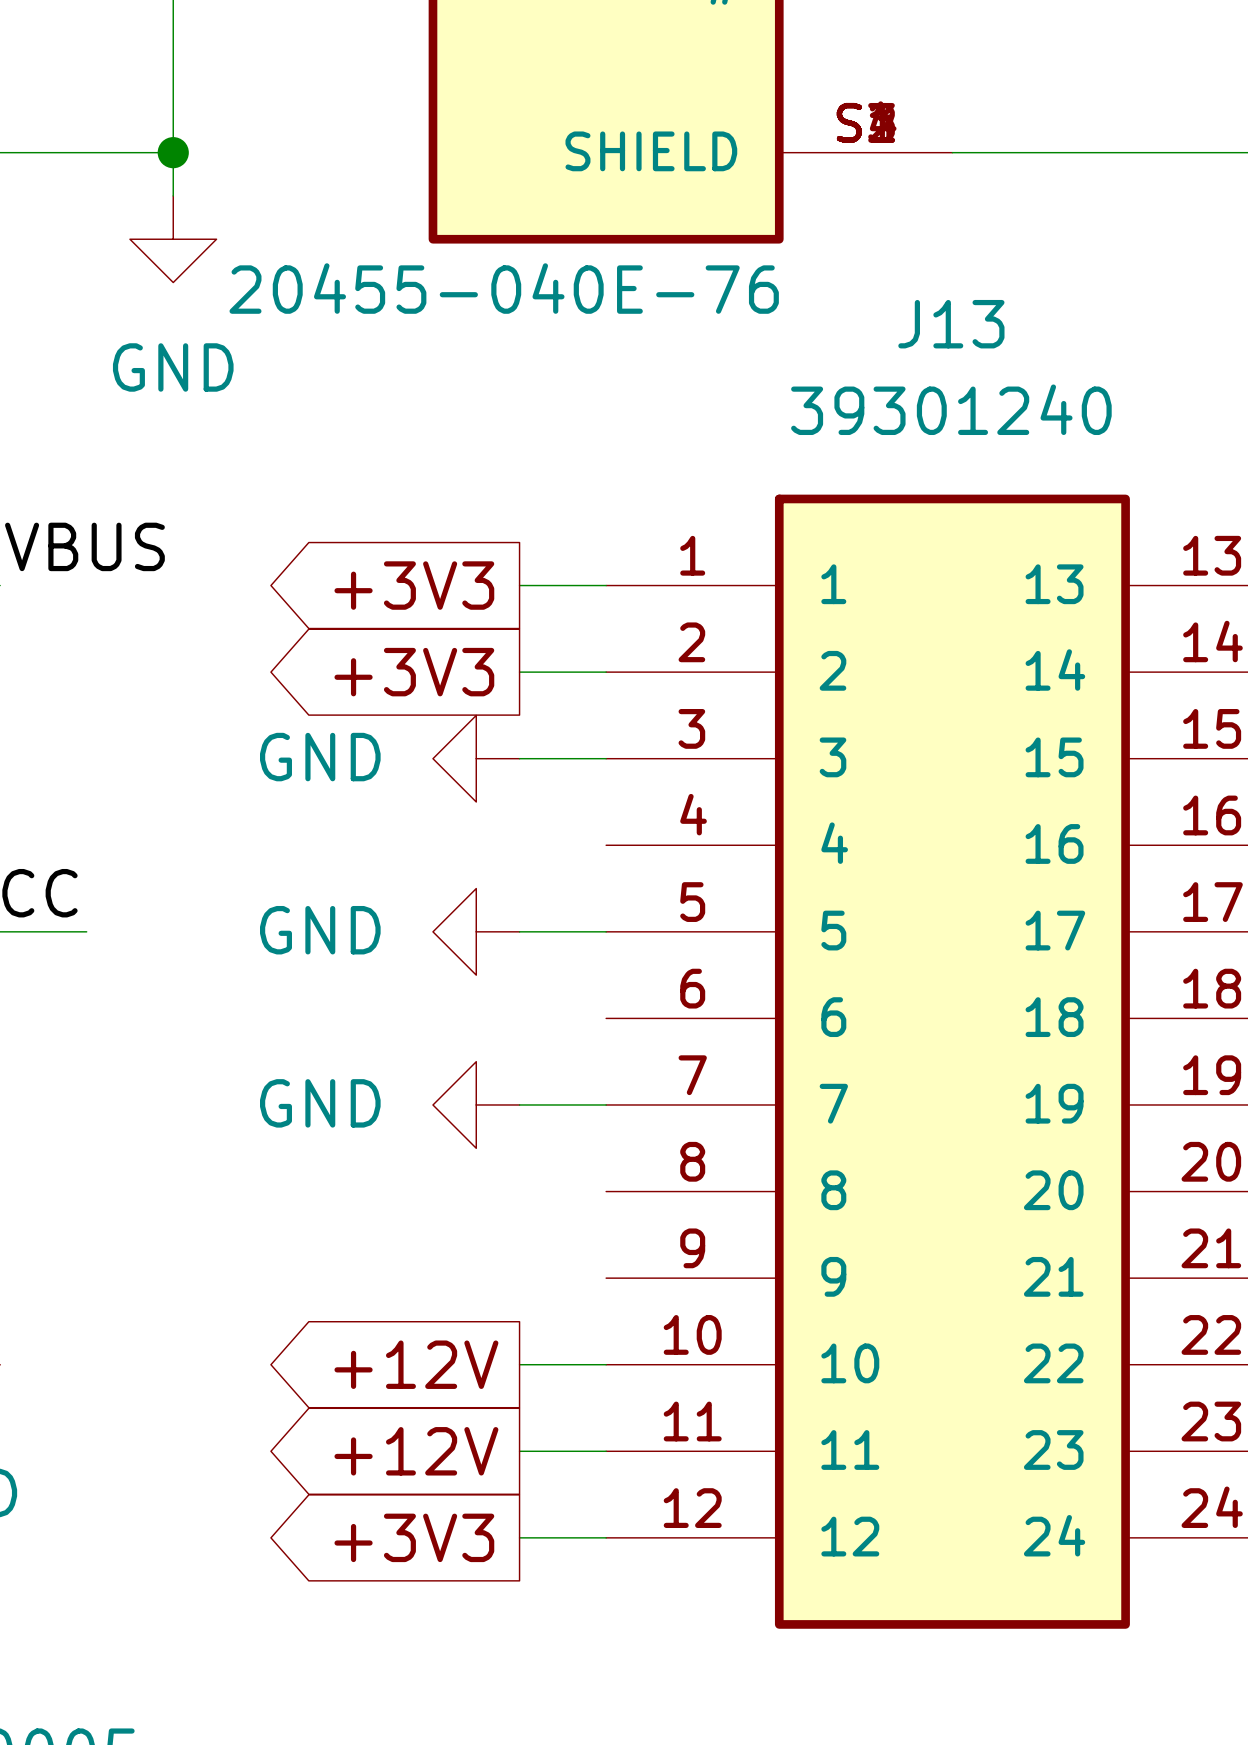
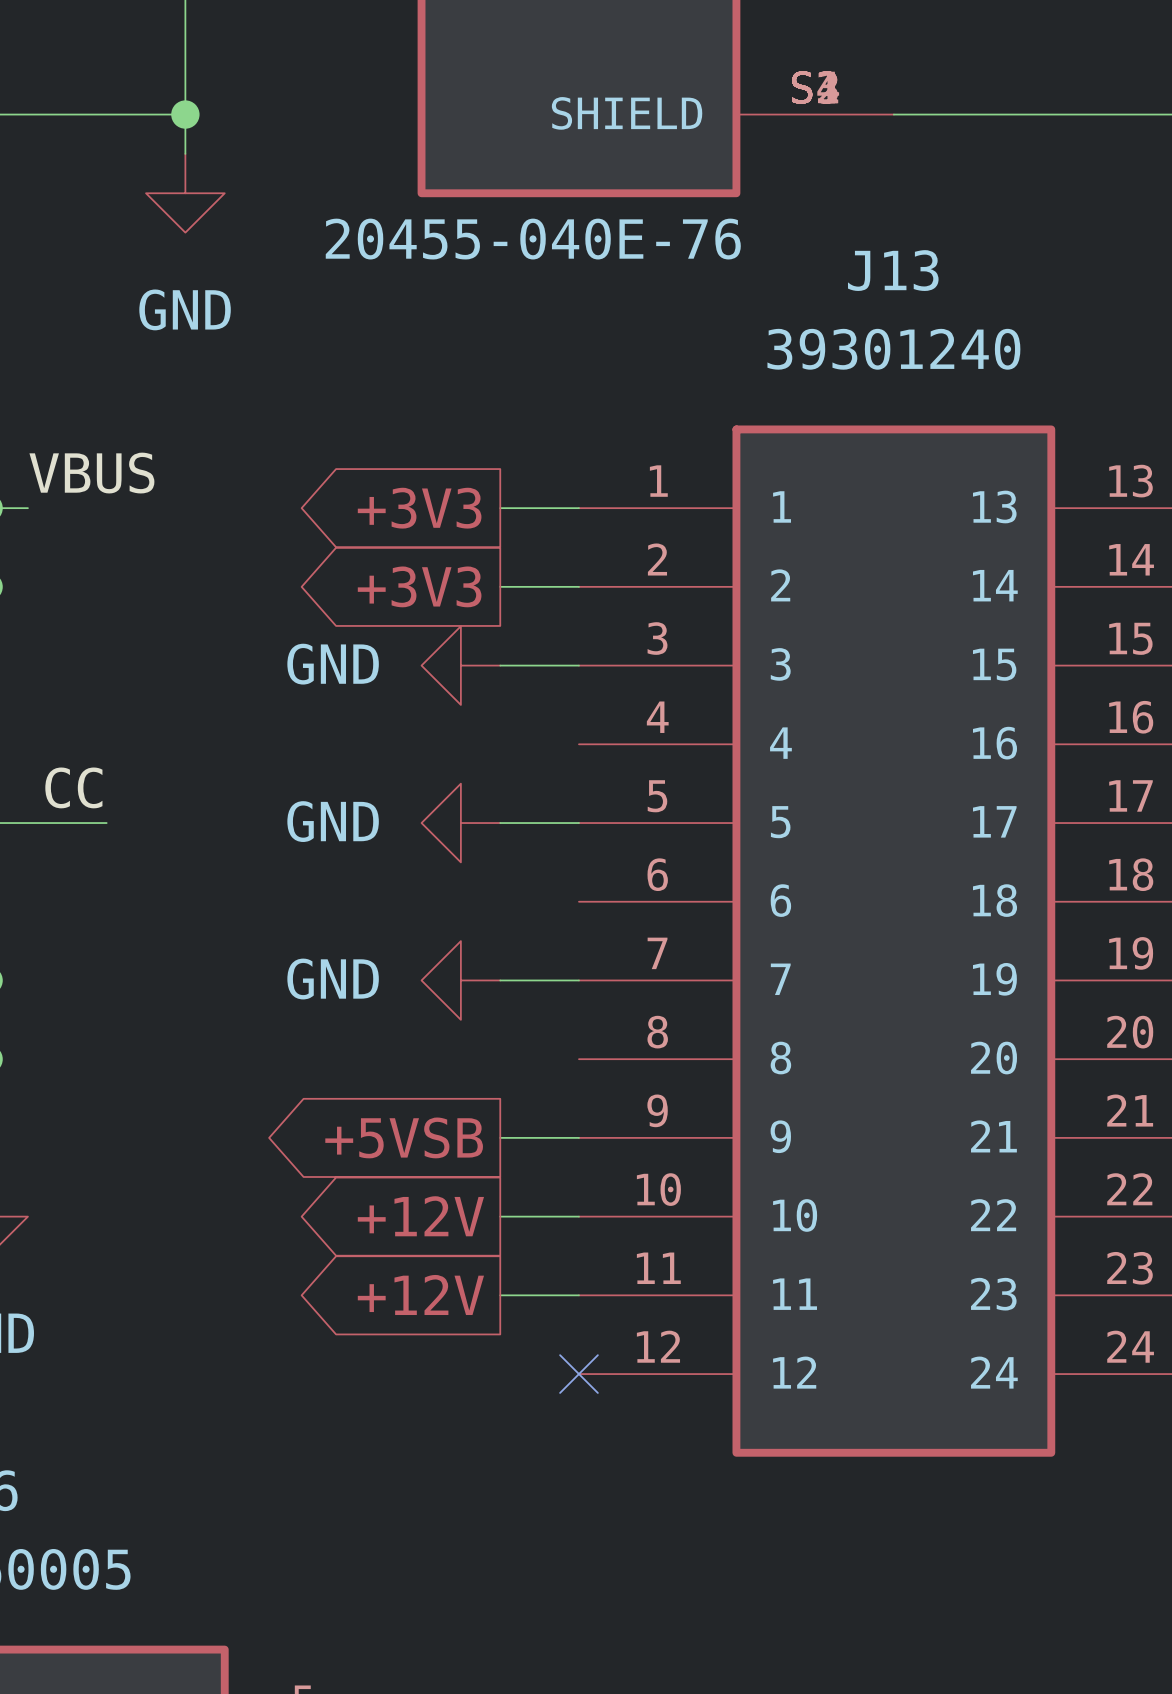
global label: none -> +5VSB (404, 1137)
global label: +3V3 (414, 1537) -> none
wire: (519, 1537) (606, 1537) -> (500, 1137) (578, 1137)
no-connect mark: none -> (578, 1374)

